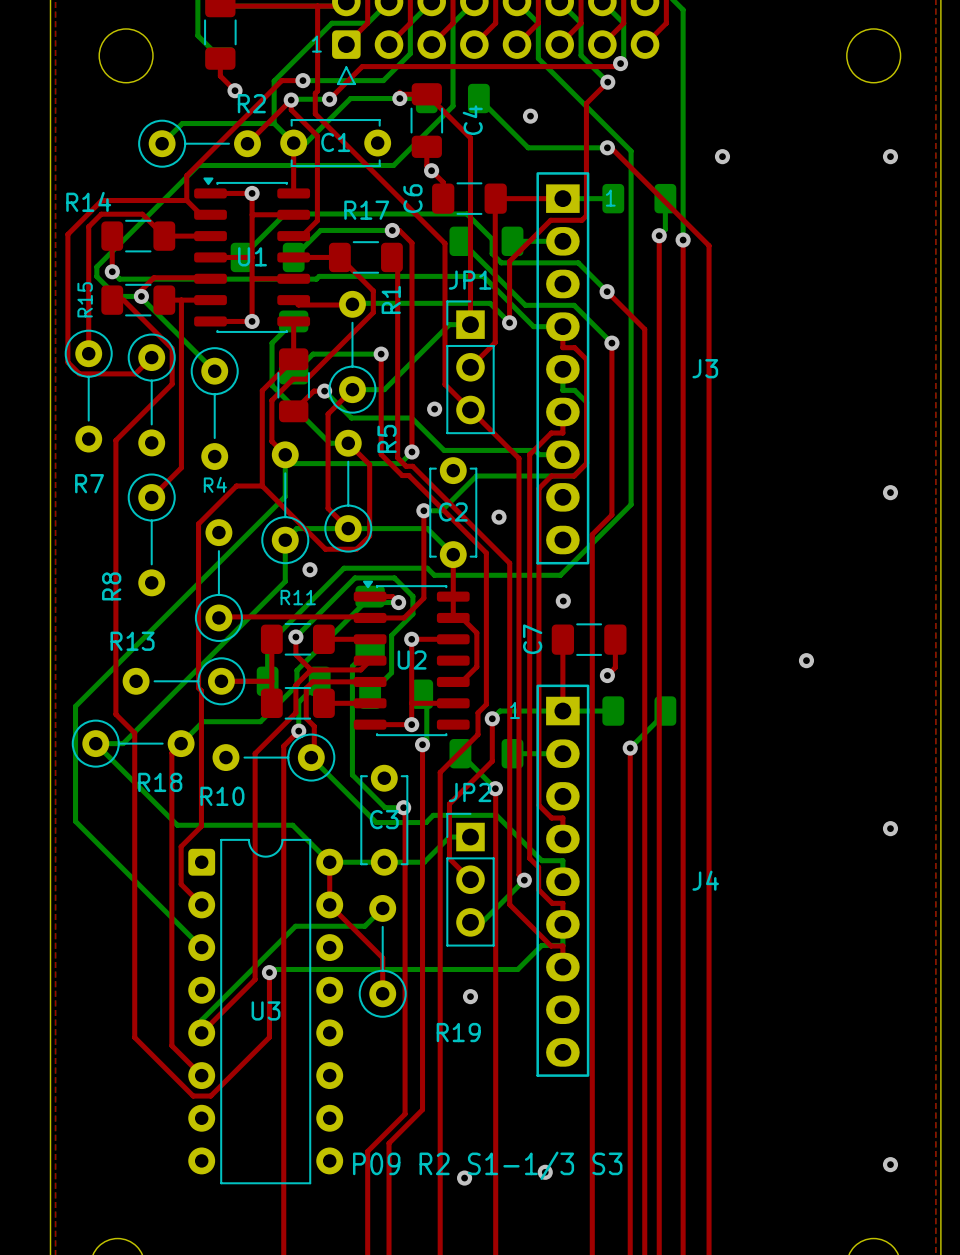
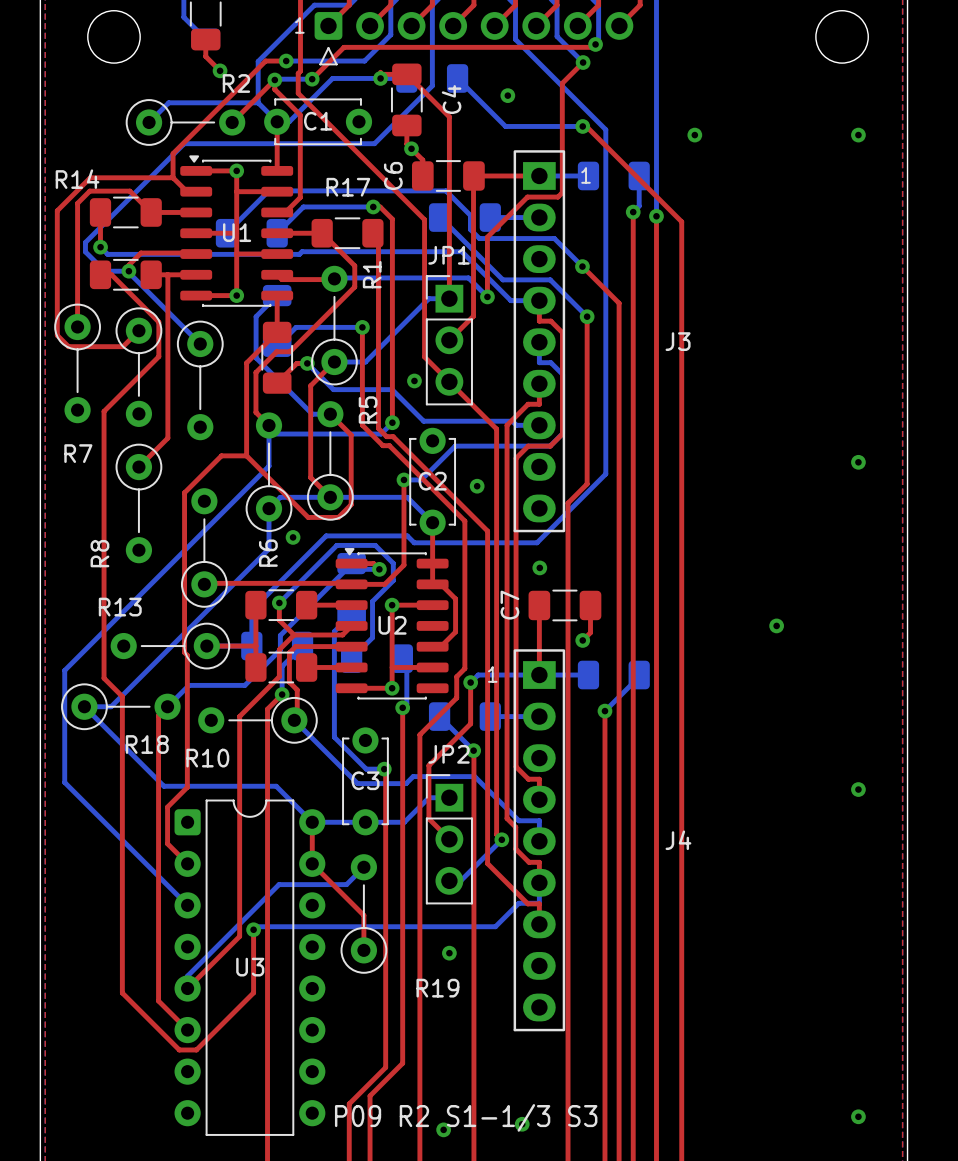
R15 name: R15 (85, 299) -> none
R4 name: R4 (215, 484) -> none
R6 name: none -> R6 (268, 553)
R11 name: R11 (298, 597) -> none

